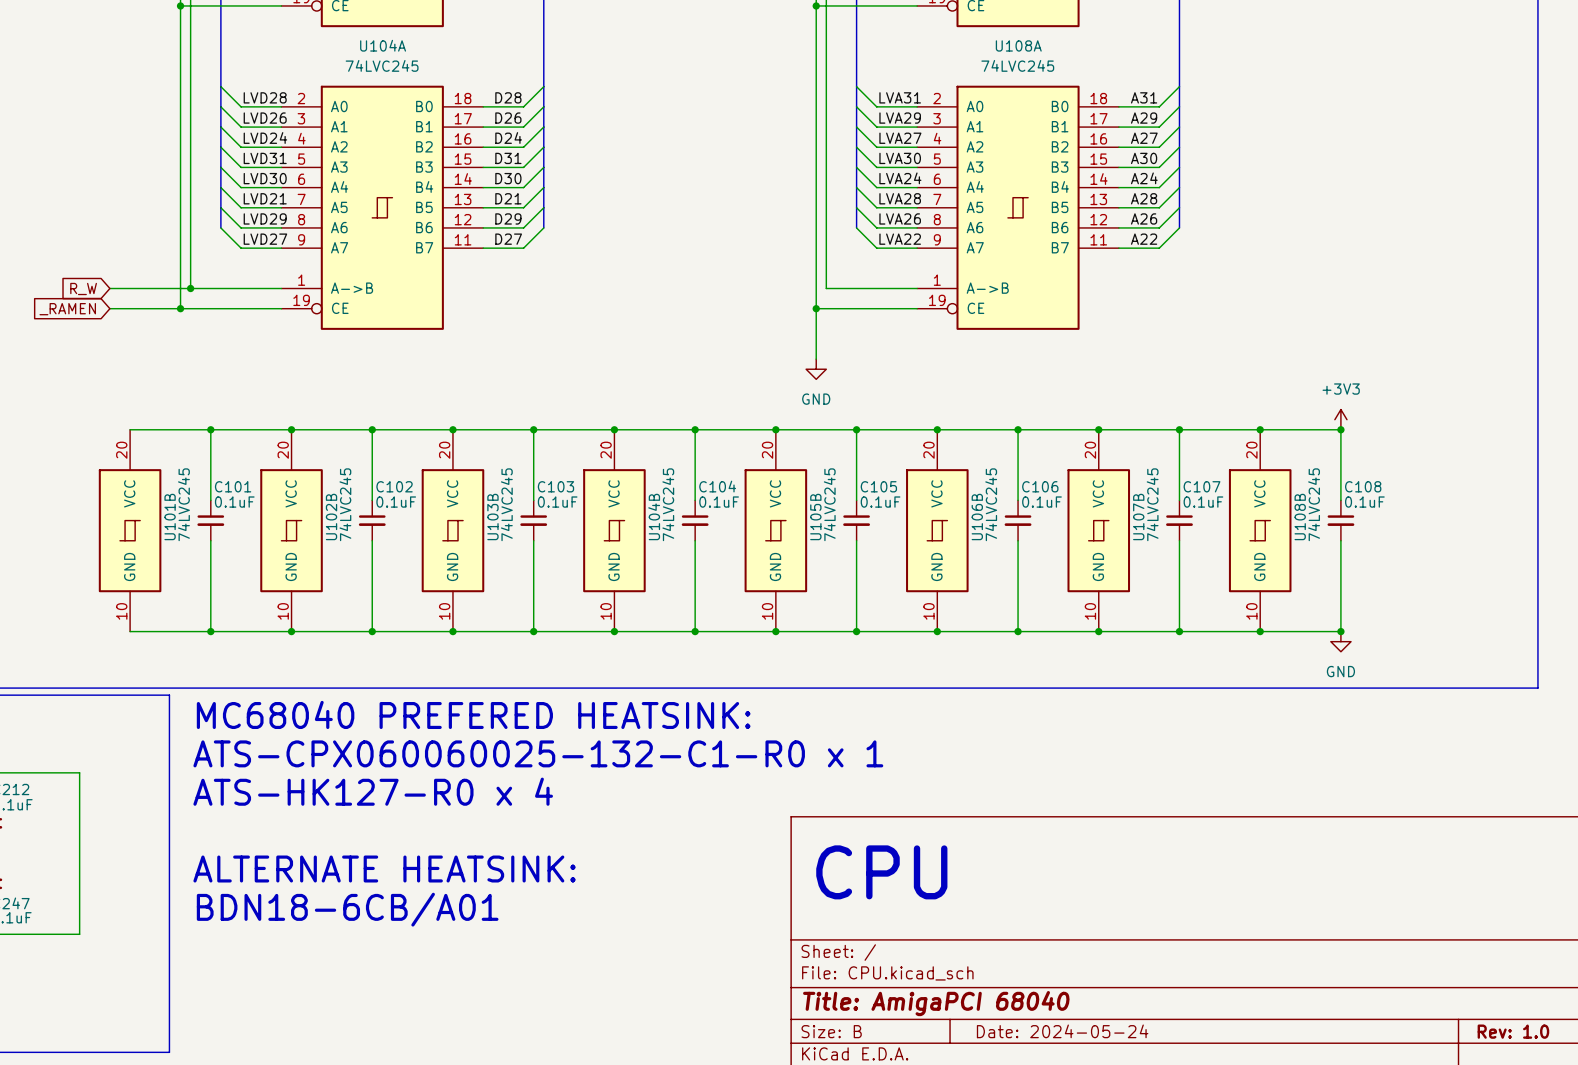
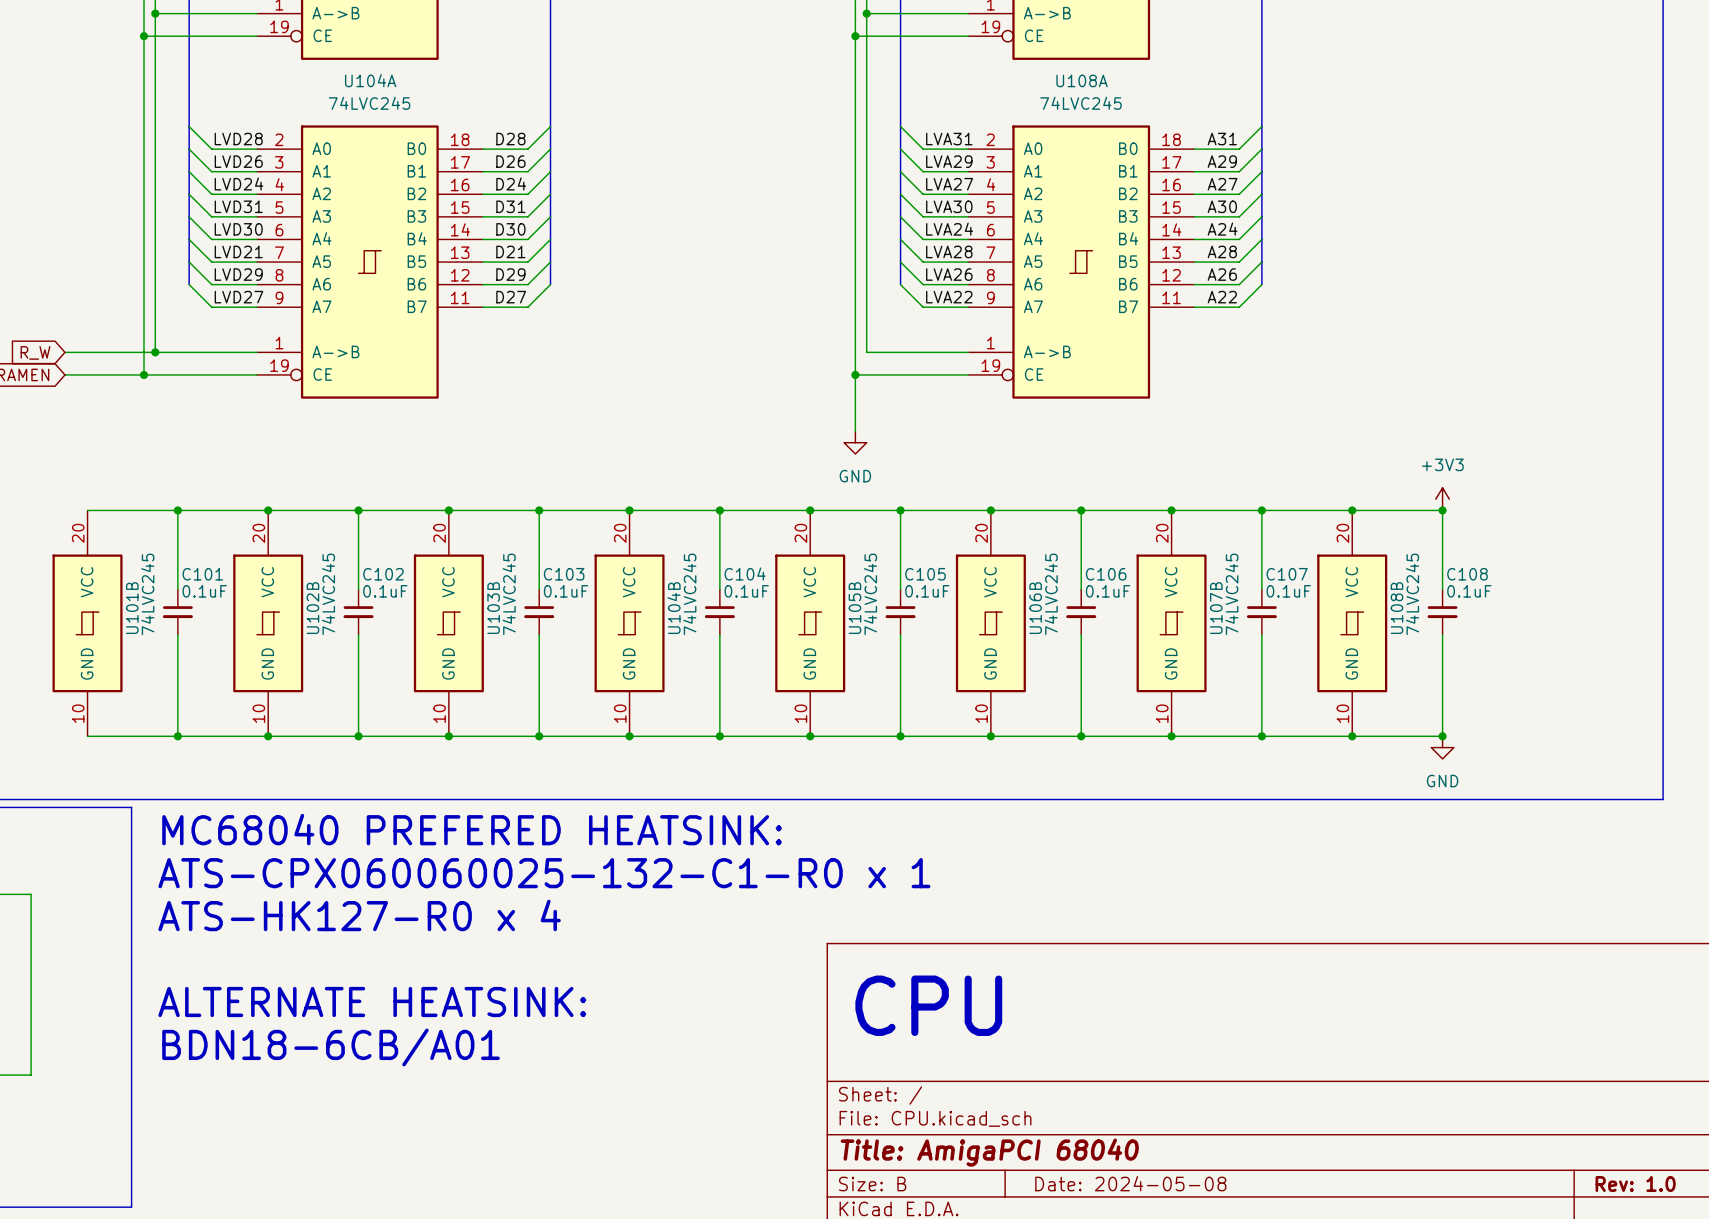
title block: Date: 2024-05-24 (1062, 1031) -> Date: 2024-05-08 (1130, 1183)

